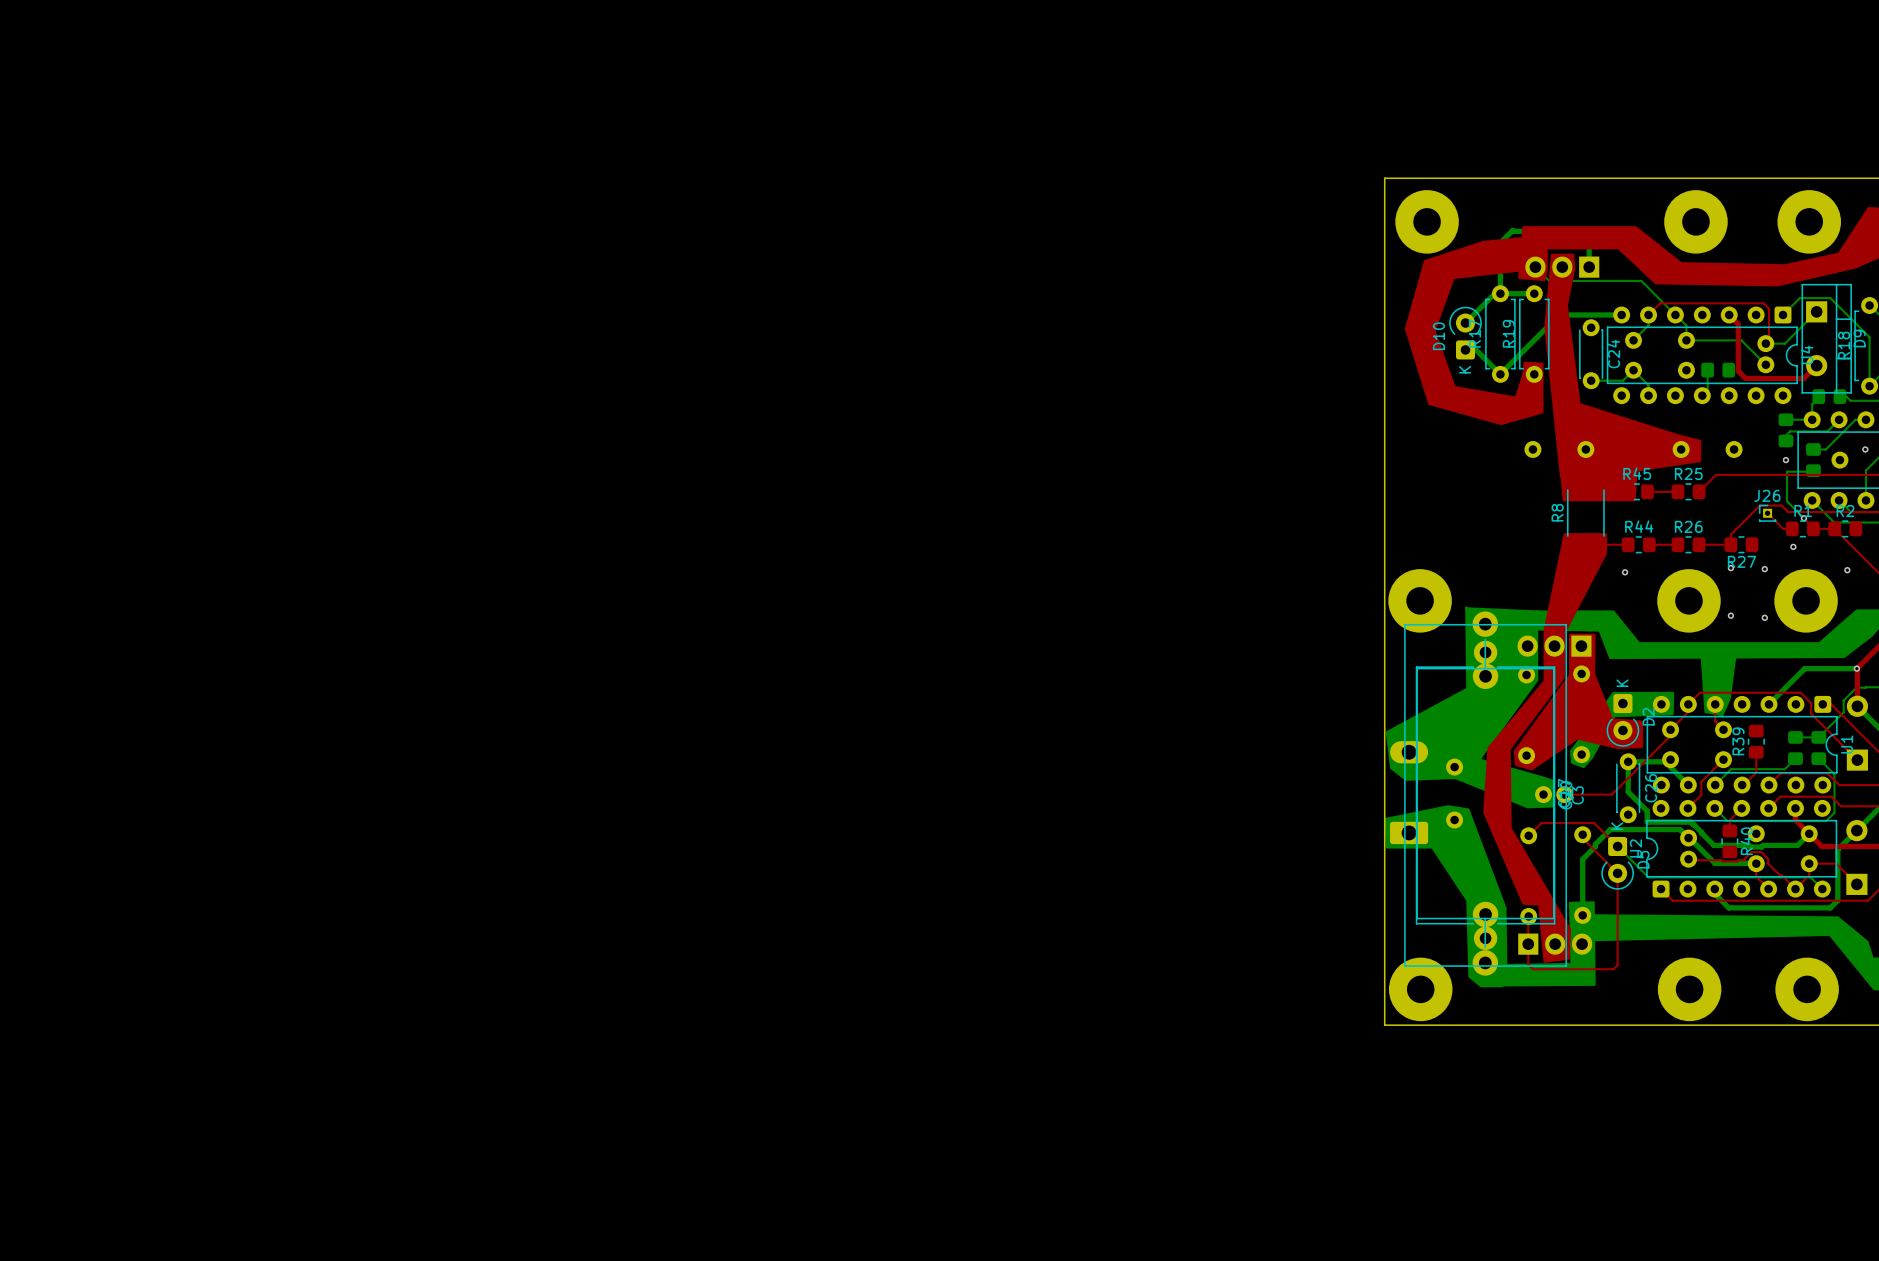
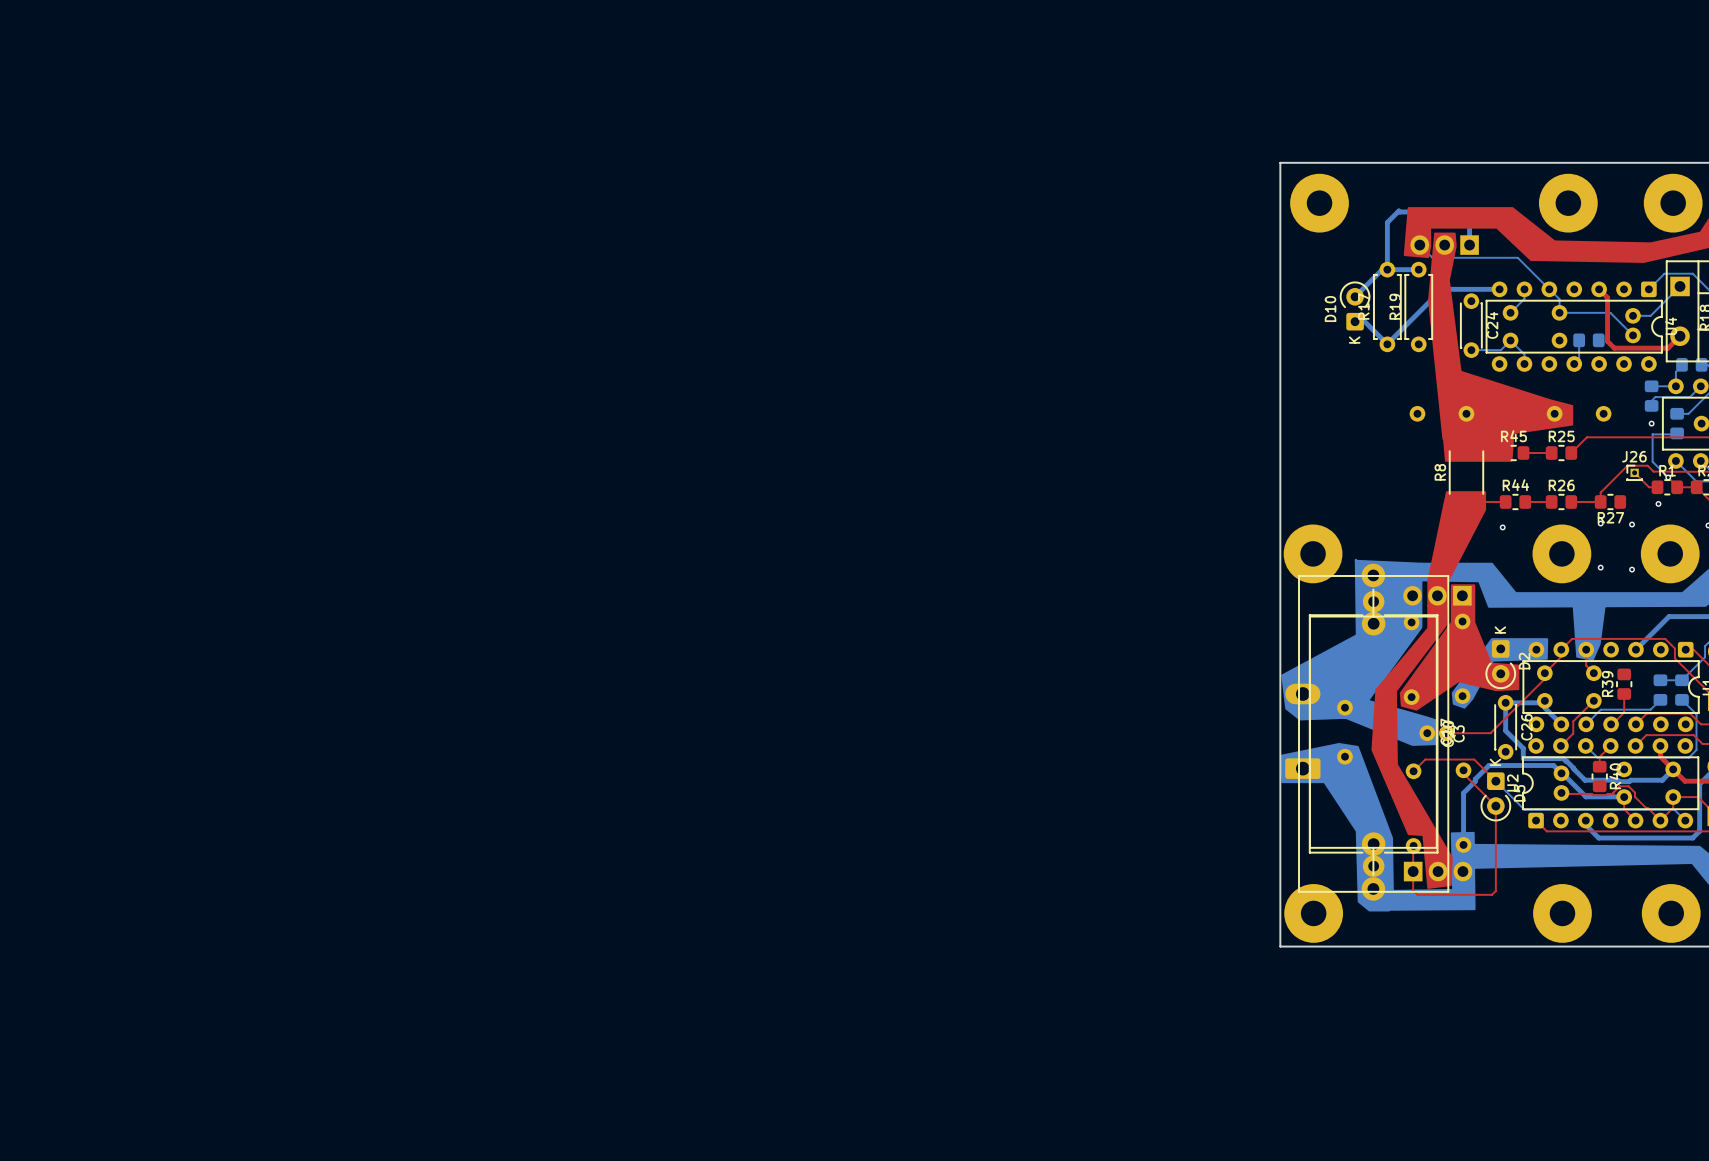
drawing: [1404, 236, 1544, 426] -> none
top track: (1648, 314) (1660, 303) (1763, 303) (1769, 308) (1769, 340) (1765, 343) -> none

